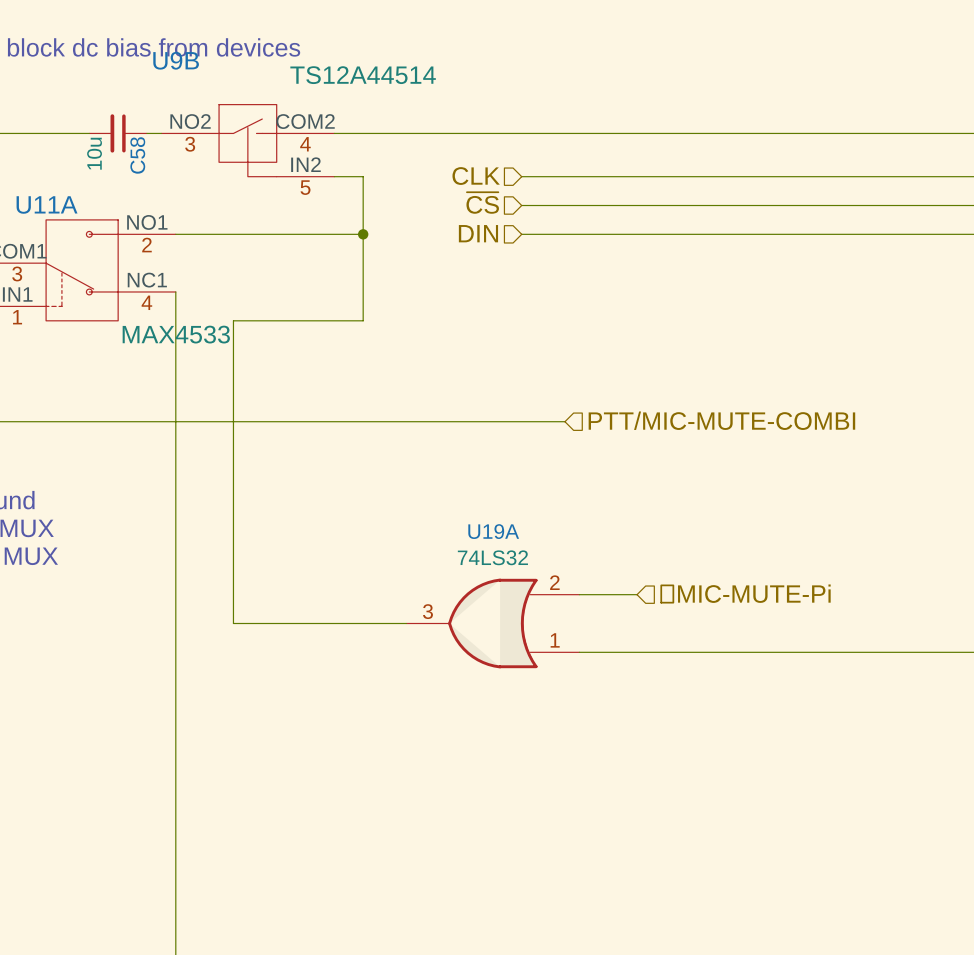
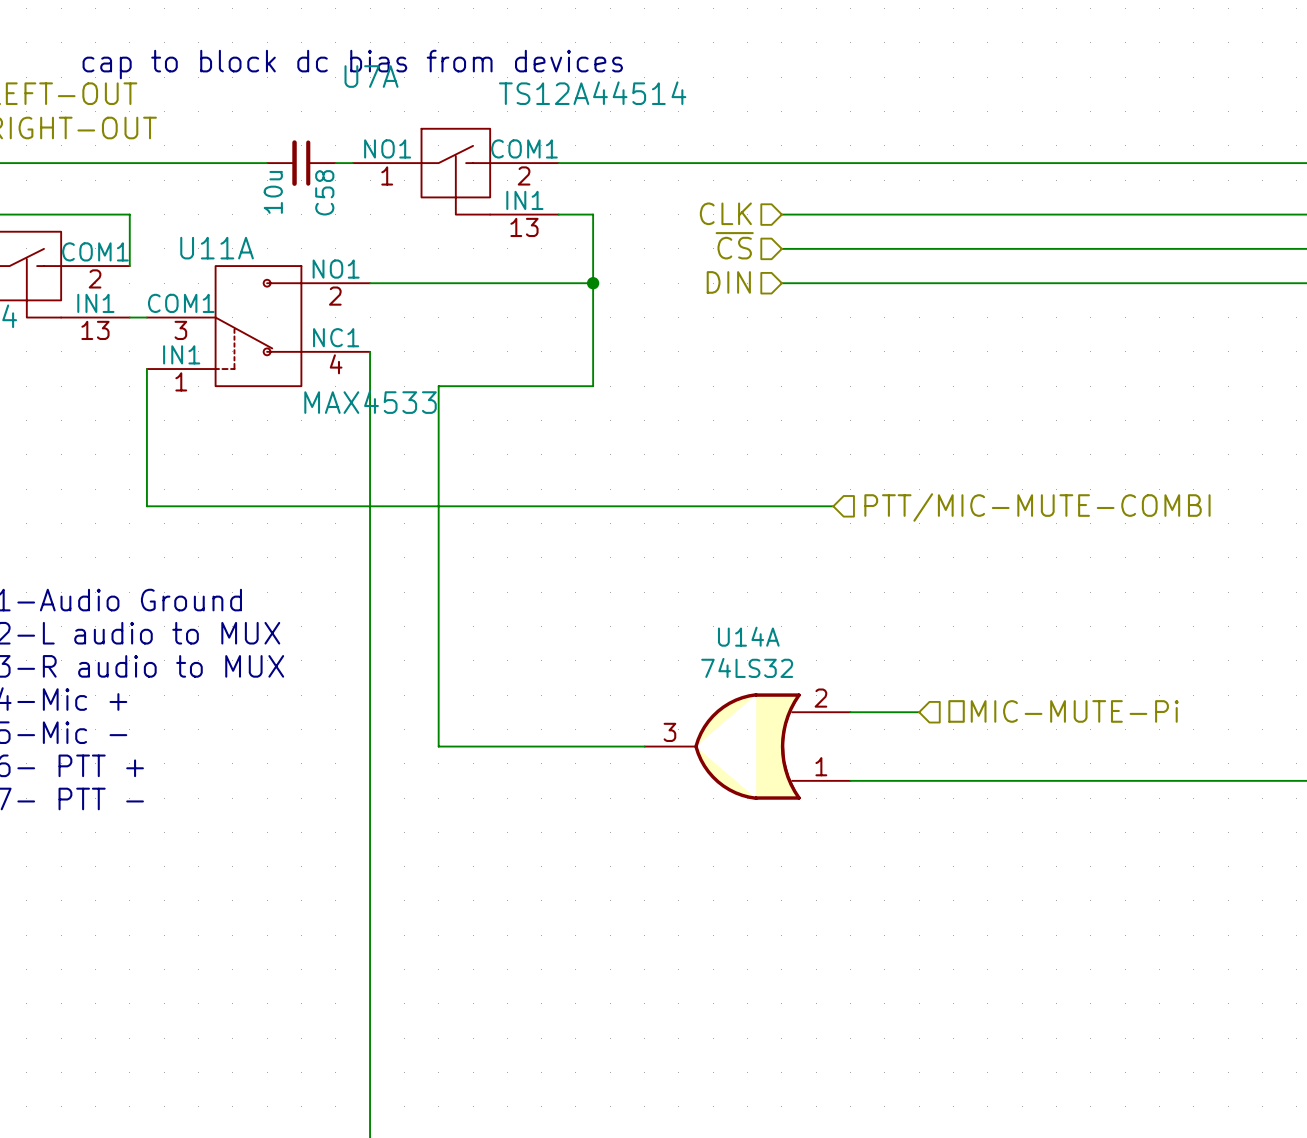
U9B name: U9B (176, 60) -> U7A (371, 76)
U9B pin name: NO2 (190, 121) -> NO1 (387, 148)
U9B pin name: COM2 (305, 121) -> COM1 (524, 148)
U9B pin number: 3 (190, 144) -> 1 (387, 175)
U9B pin number: 4 (305, 144) -> 2 (524, 175)
U9B pin name: IN2 (305, 164) -> IN1 (524, 200)
U9B pin number: 5 (305, 187) -> 13 (524, 227)
U19A name: U19A (493, 531) -> U14A (748, 636)

